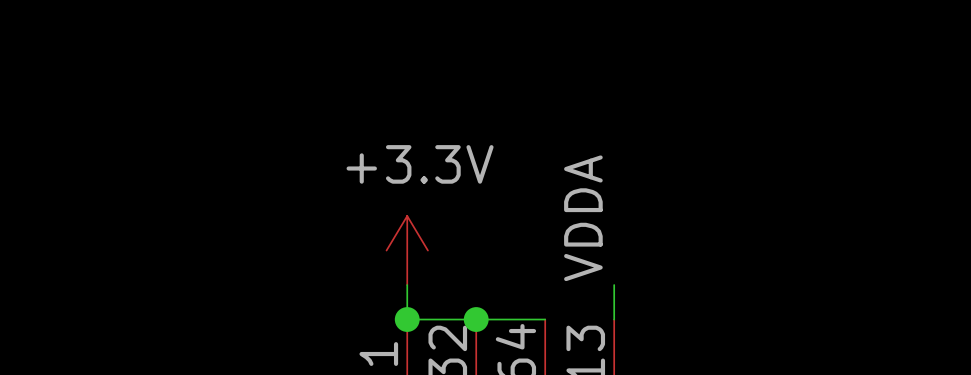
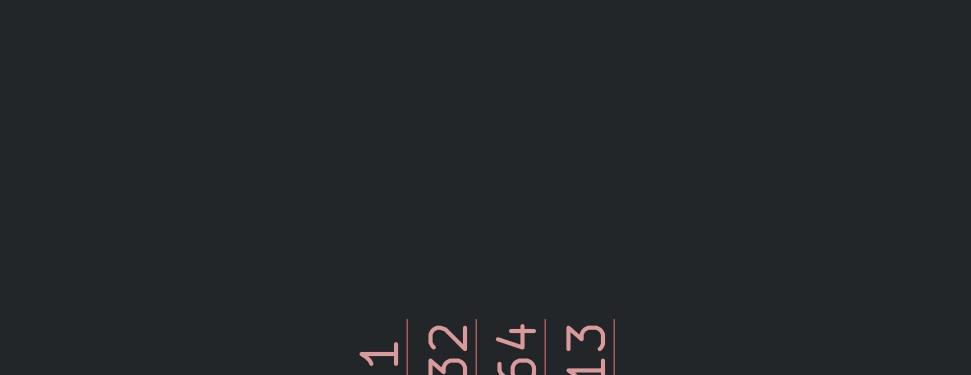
label: VDDA (583, 218) -> none
power symbol: +3.3V (407, 250) -> none
wire: (407, 285) (407, 319) (545, 319) -> none
wire: (614, 285) (614, 319) -> none
junction: (407, 319) -> none
junction: (476, 319) -> none

